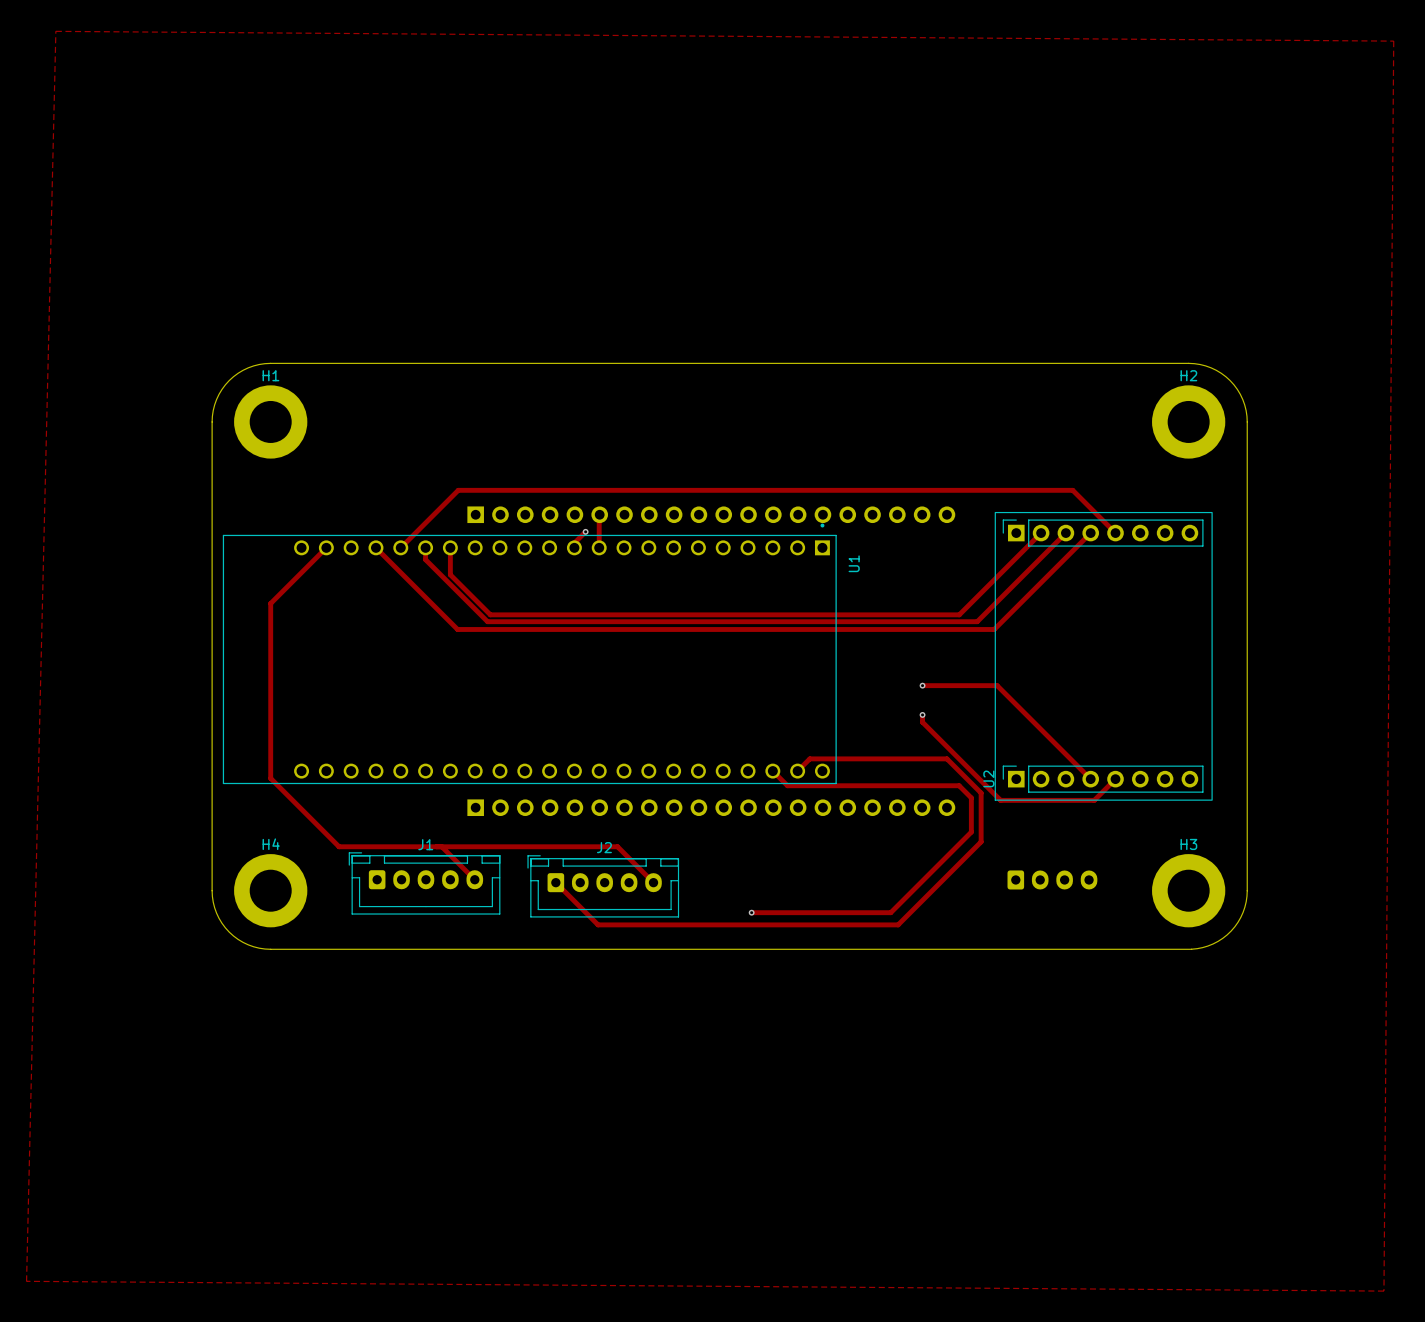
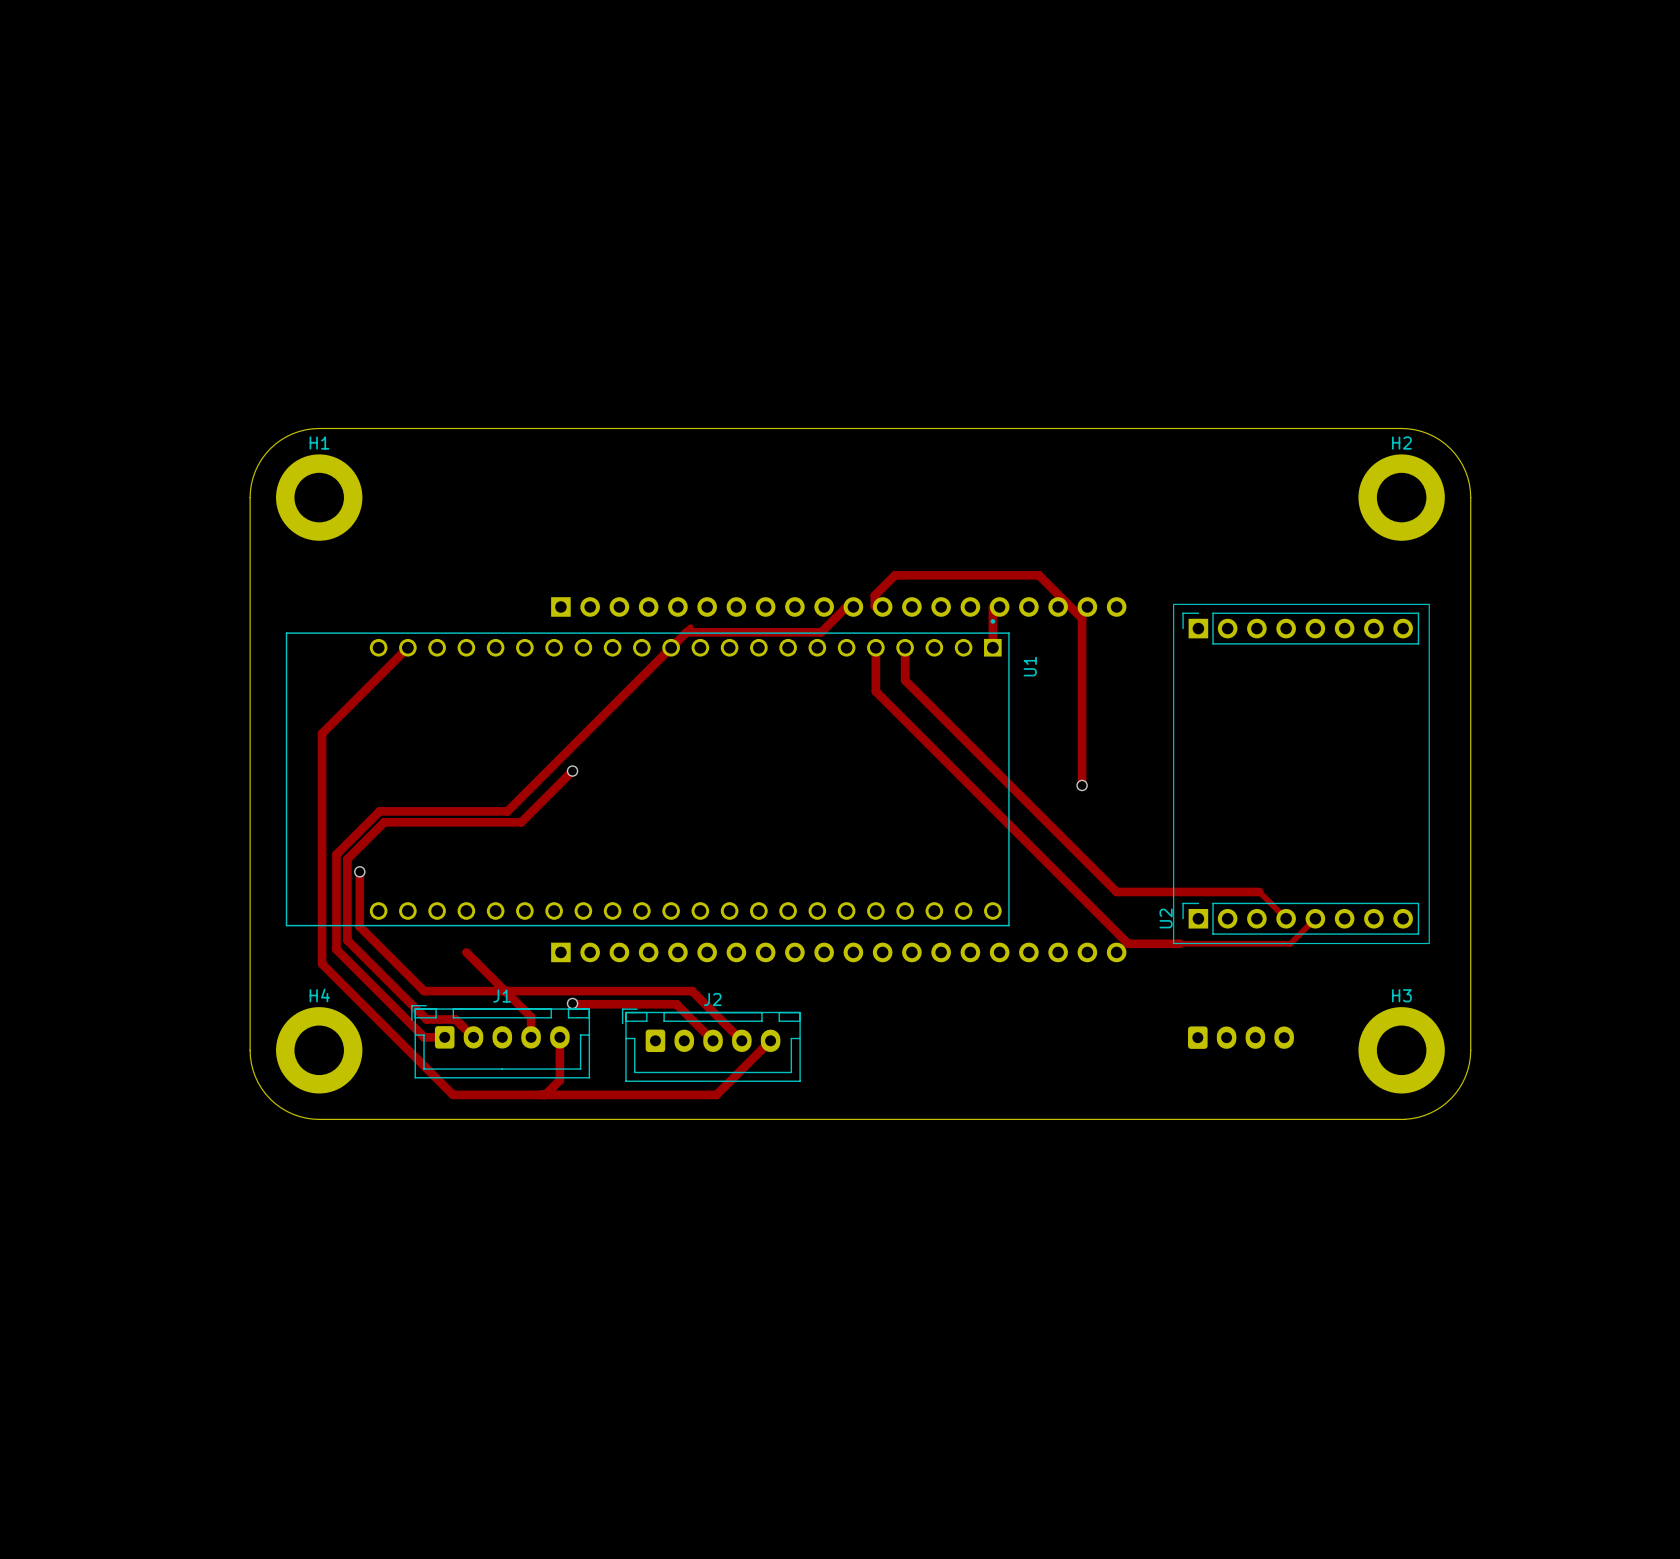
zone outline: (55, 31) (1393, 41) (1383, 1291) (26, 1281) (55, 31) -> none
track: (599, 514) (599, 547) -> none
track: none -> (846, 606) (821, 632) (686, 632) (507, 811) (379, 811) (336, 854) (336, 949) (424, 1037) (444, 1037)
track: none -> (875, 606) (874, 595) (894, 575) (1038, 575) (1082, 618) (1082, 785)
track: none -> (992, 606) (992, 647)
via: (585, 531) -> none
track: (1041, 533) (959, 614) (490, 614) (450, 574) (450, 547) -> none
track: (1065, 533) (977, 621) (487, 621) (425, 559) (425, 547) -> none
track: (1090, 533) (994, 629) (457, 629) (375, 547) -> none
track: (1115, 533) (1072, 490) (458, 490) (400, 547) -> none
track: (326, 547) (270, 603) (270, 778) (339, 846) (617, 846) (653, 882) -> (407, 647) (322, 733) (322, 963) (453, 1094) (716, 1094) (770, 1040)
track: none -> (572, 771) (521, 822) (384, 822) (347, 859) (347, 940) (426, 1019) (455, 1019) (473, 1037)
via: none -> (572, 771)
U1 position: (529, 653) -> (647, 772)
via: none -> (1082, 785)
track: (922, 685) (997, 685) (1068, 756) -> (905, 647) (905, 680) (1116, 891) (1259, 891)
via: (922, 685) -> none
track: (922, 714) (922, 722) (1000, 800) -> (875, 647) (875, 691) (1128, 943) (1179, 943)
via: (922, 714) -> none
track: none -> (359, 871) (359, 926) (424, 991) (692, 991) (741, 1040)
via: none -> (359, 871)
track: (772, 771) (787, 785) (959, 785) (971, 797) (971, 832) (890, 912) (751, 912) -> none
track: (797, 771) (809, 758) (946, 758) (981, 793) (981, 841) (898, 924) (598, 924) (555, 882) -> none
track: none -> (466, 952) (531, 1017) (531, 1037)
track: (441, 846) (474, 879) -> (545, 1094) (559, 1080) (559, 1037)
track: none -> (572, 1003) (676, 1004) (713, 1040)
via: none -> (572, 1003)
via: (751, 912) -> none

